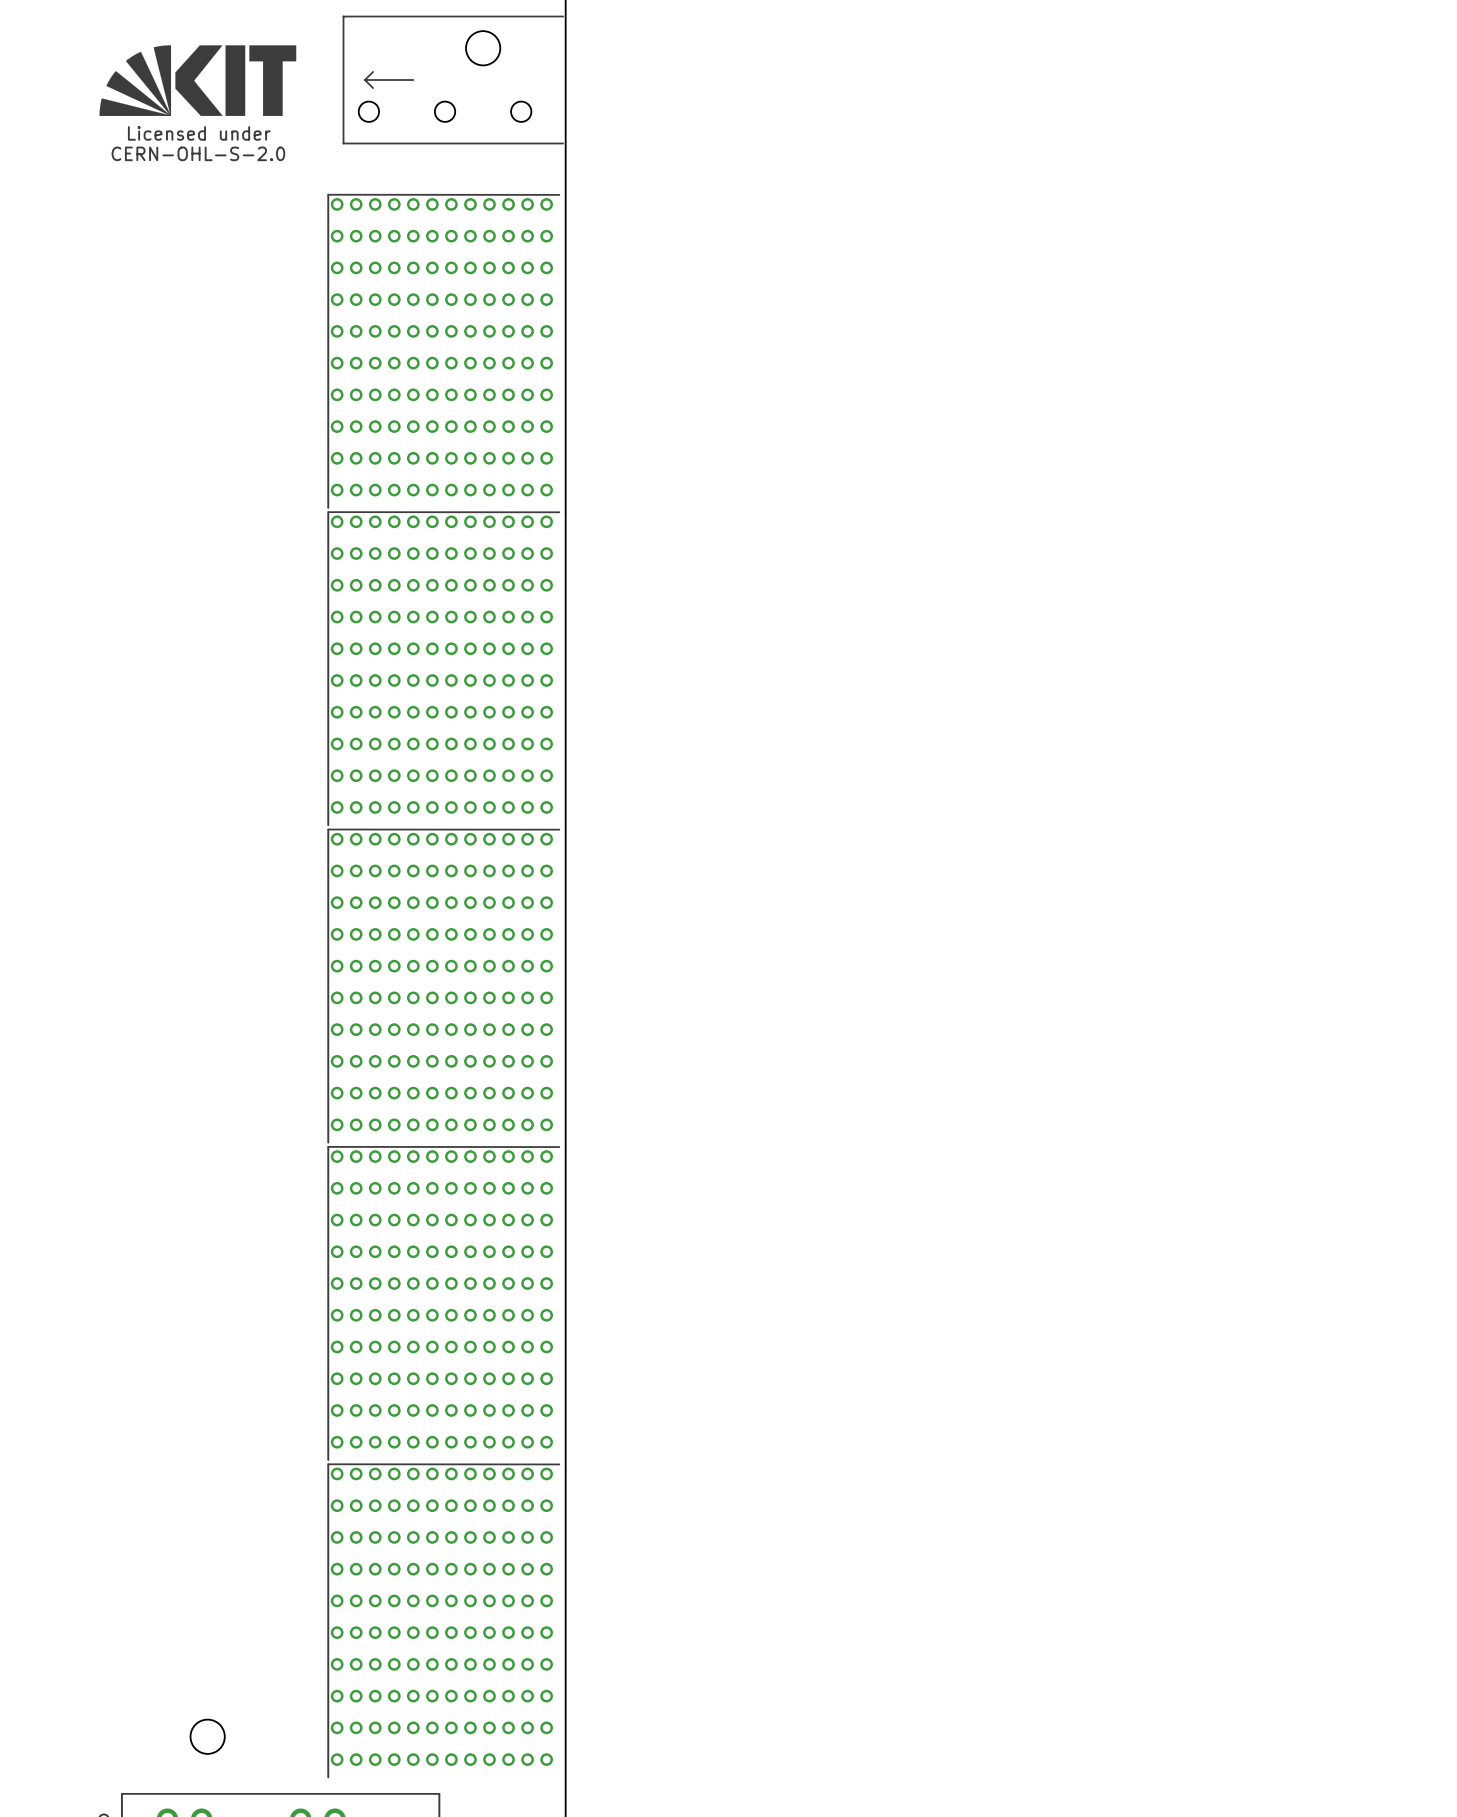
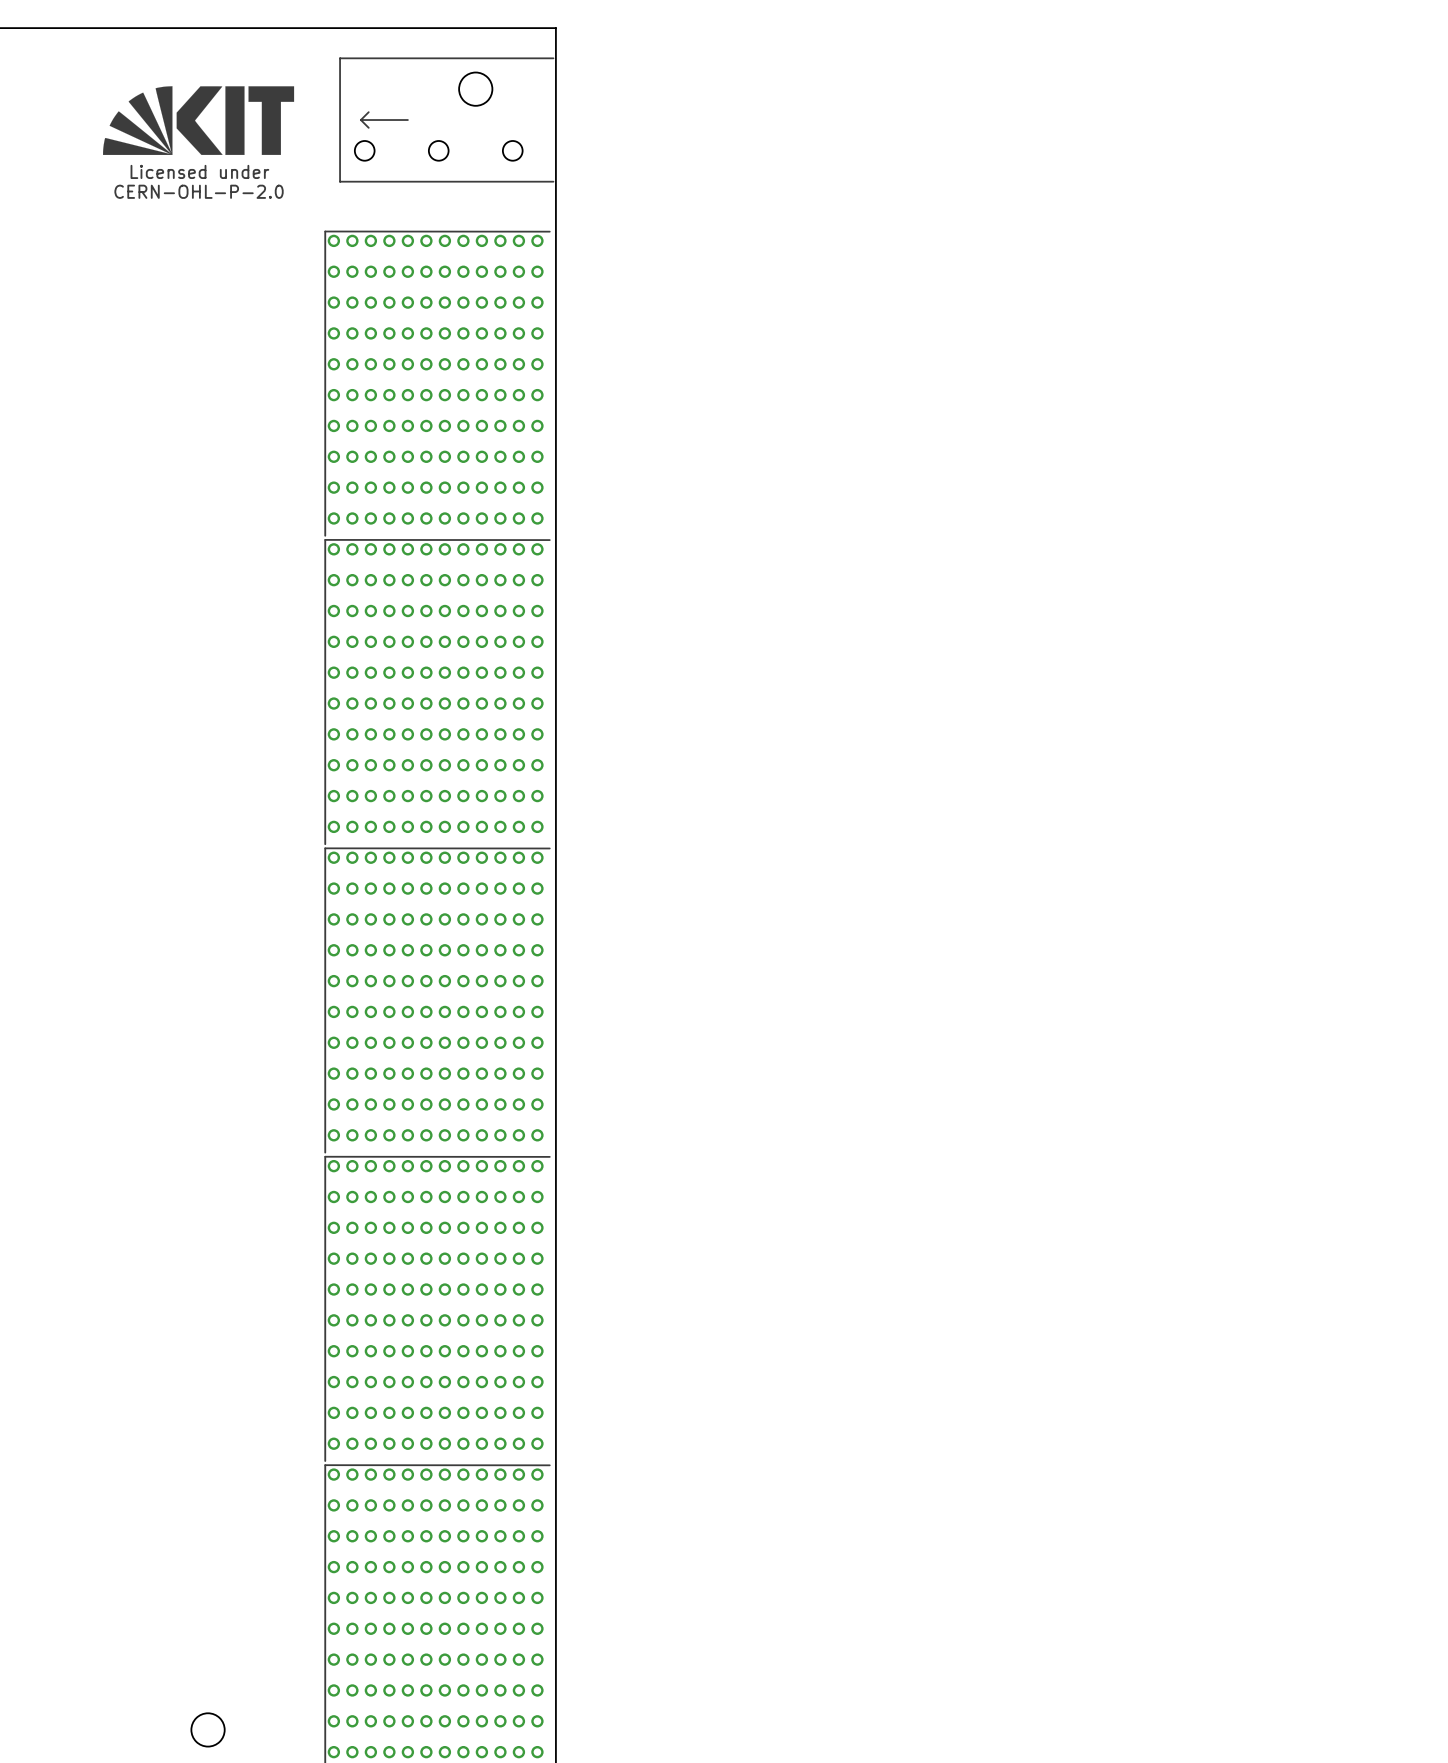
text: CERN-OHL-S-2.0 (198, 153) -> CERN-OHL-P-2.0 (199, 191)

